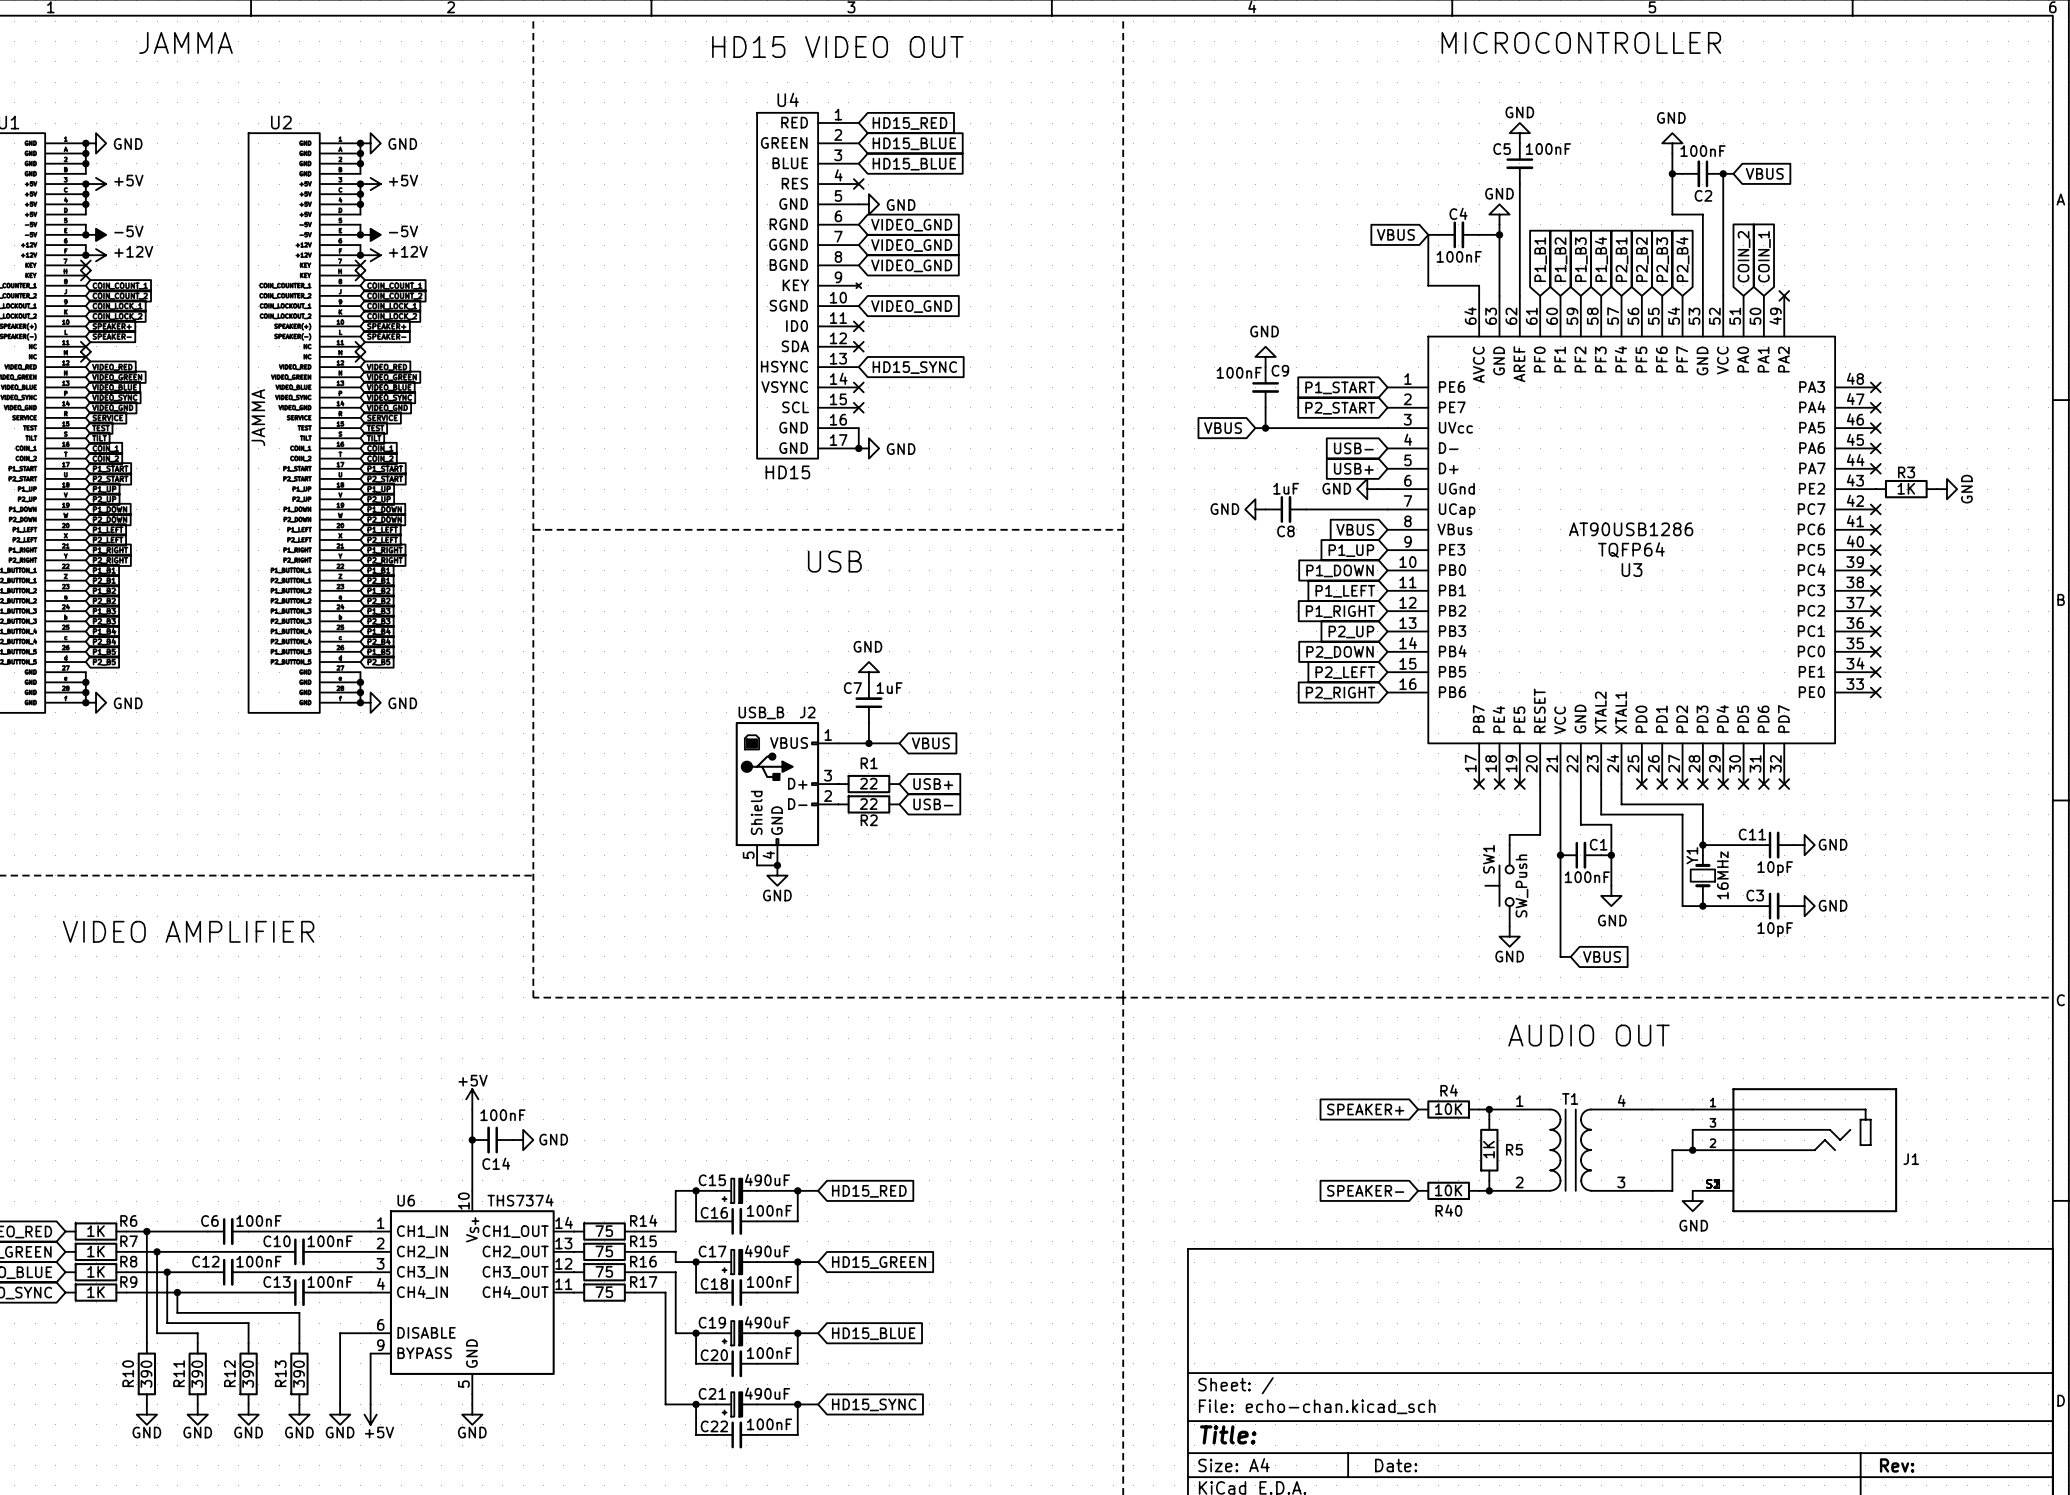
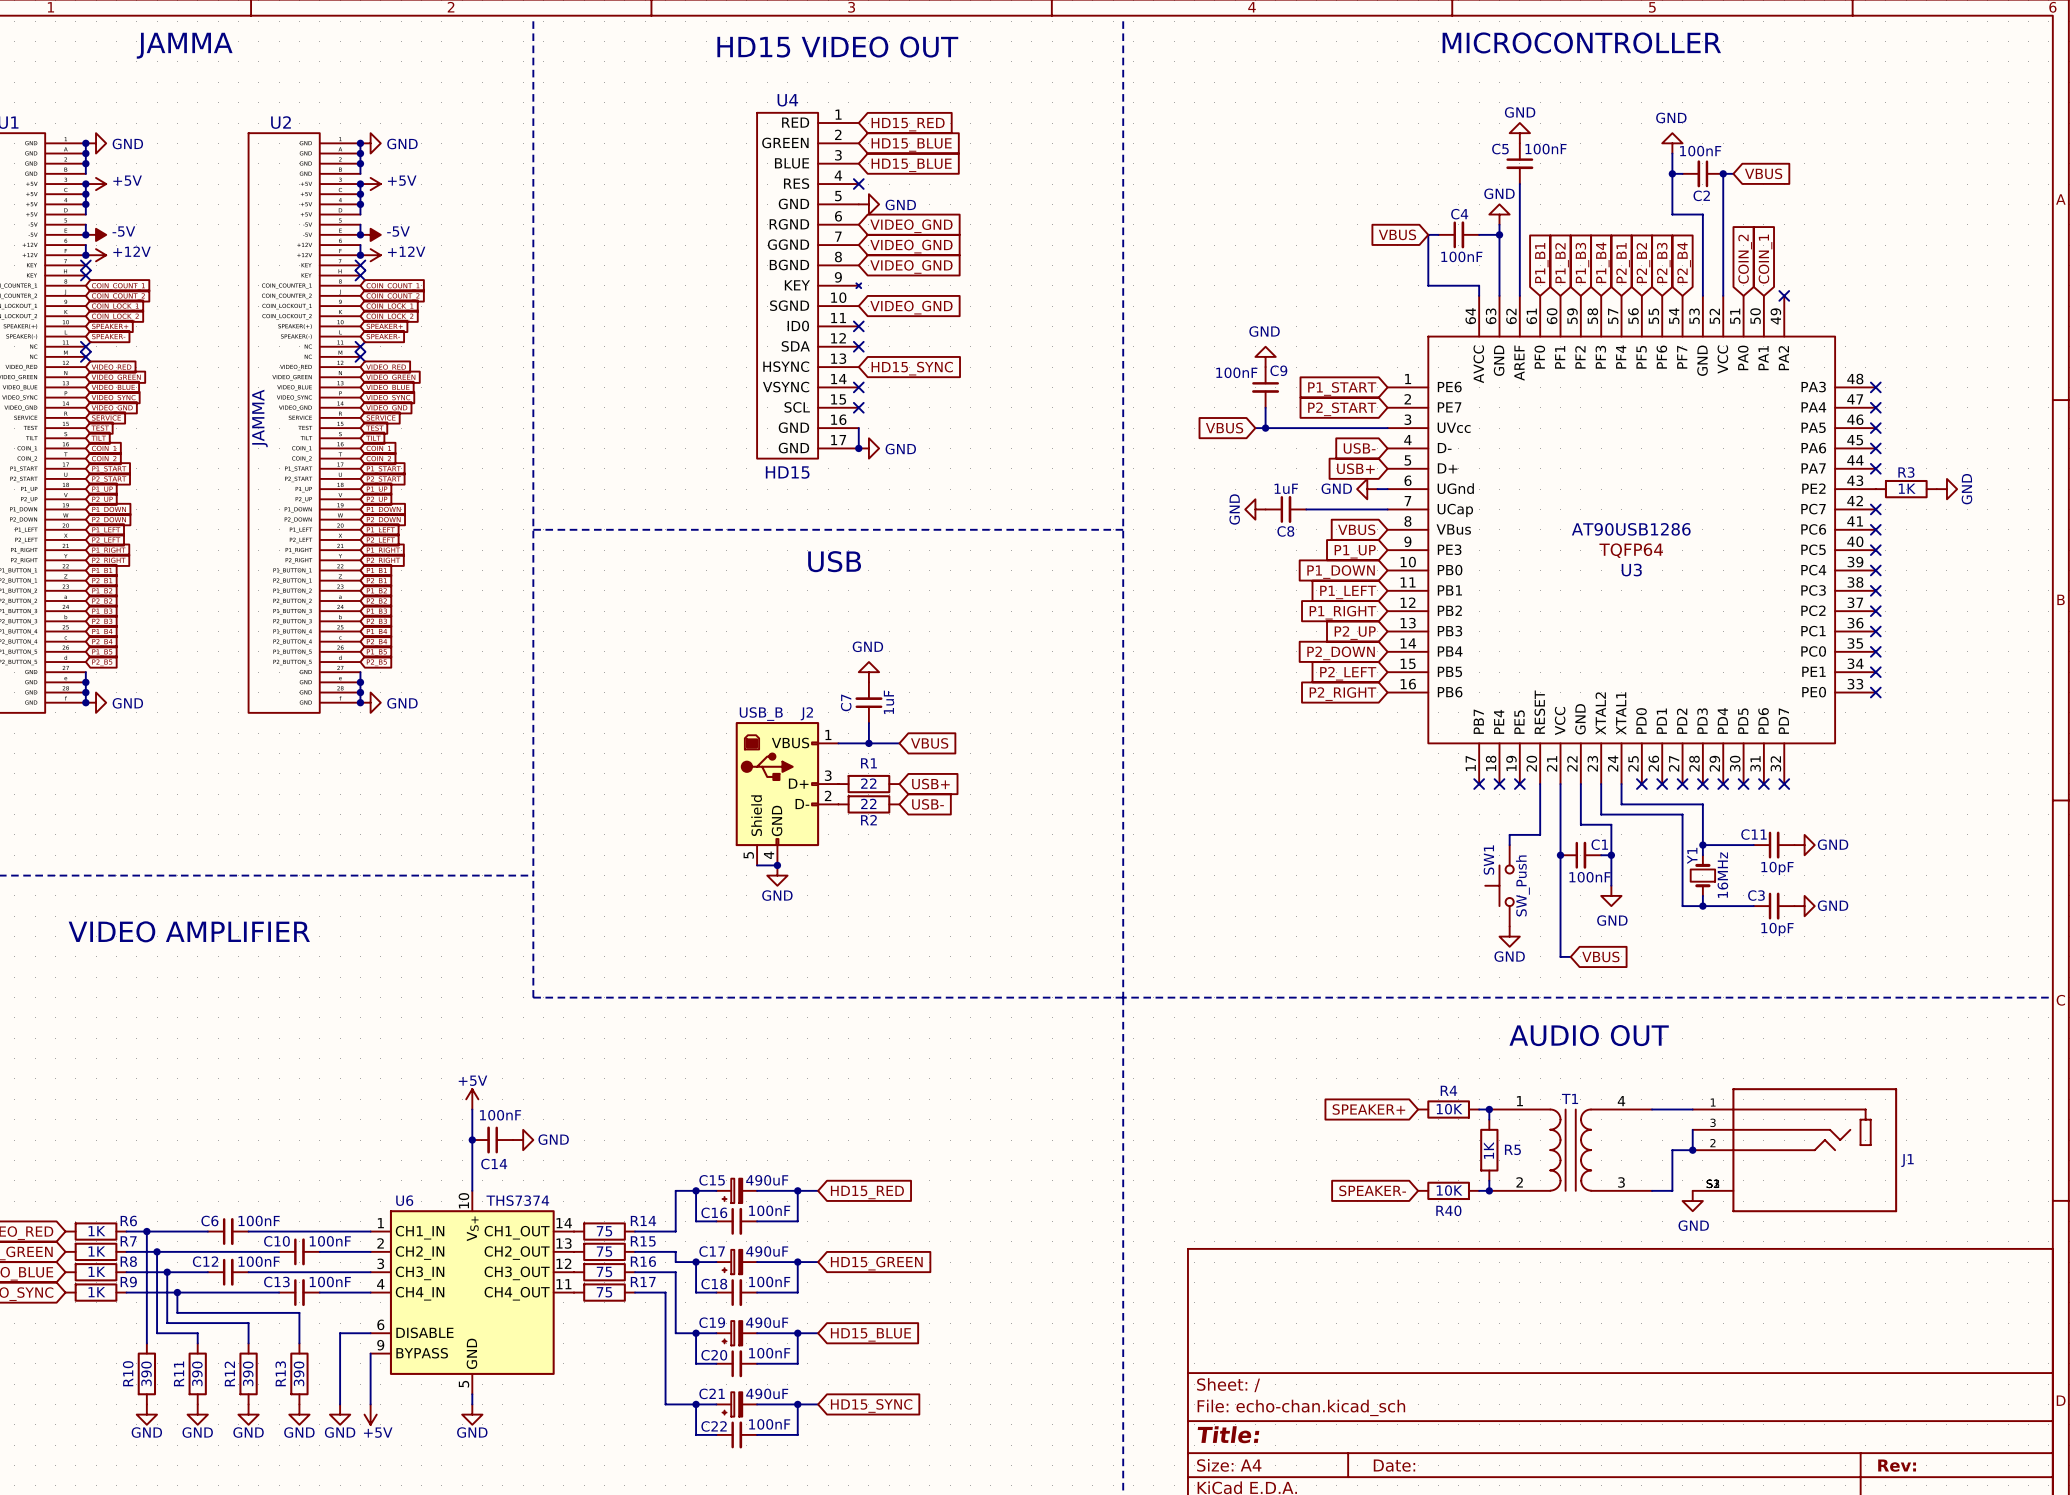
power symbol text rotation: 0° (1224, 509) -> 90° counterclockwise (1234, 509)
C7 name rotation: 0° (852, 688) -> 90° counterclockwise (846, 702)
C7 value rotation: 0° (889, 688) -> 90° counterclockwise (889, 702)

